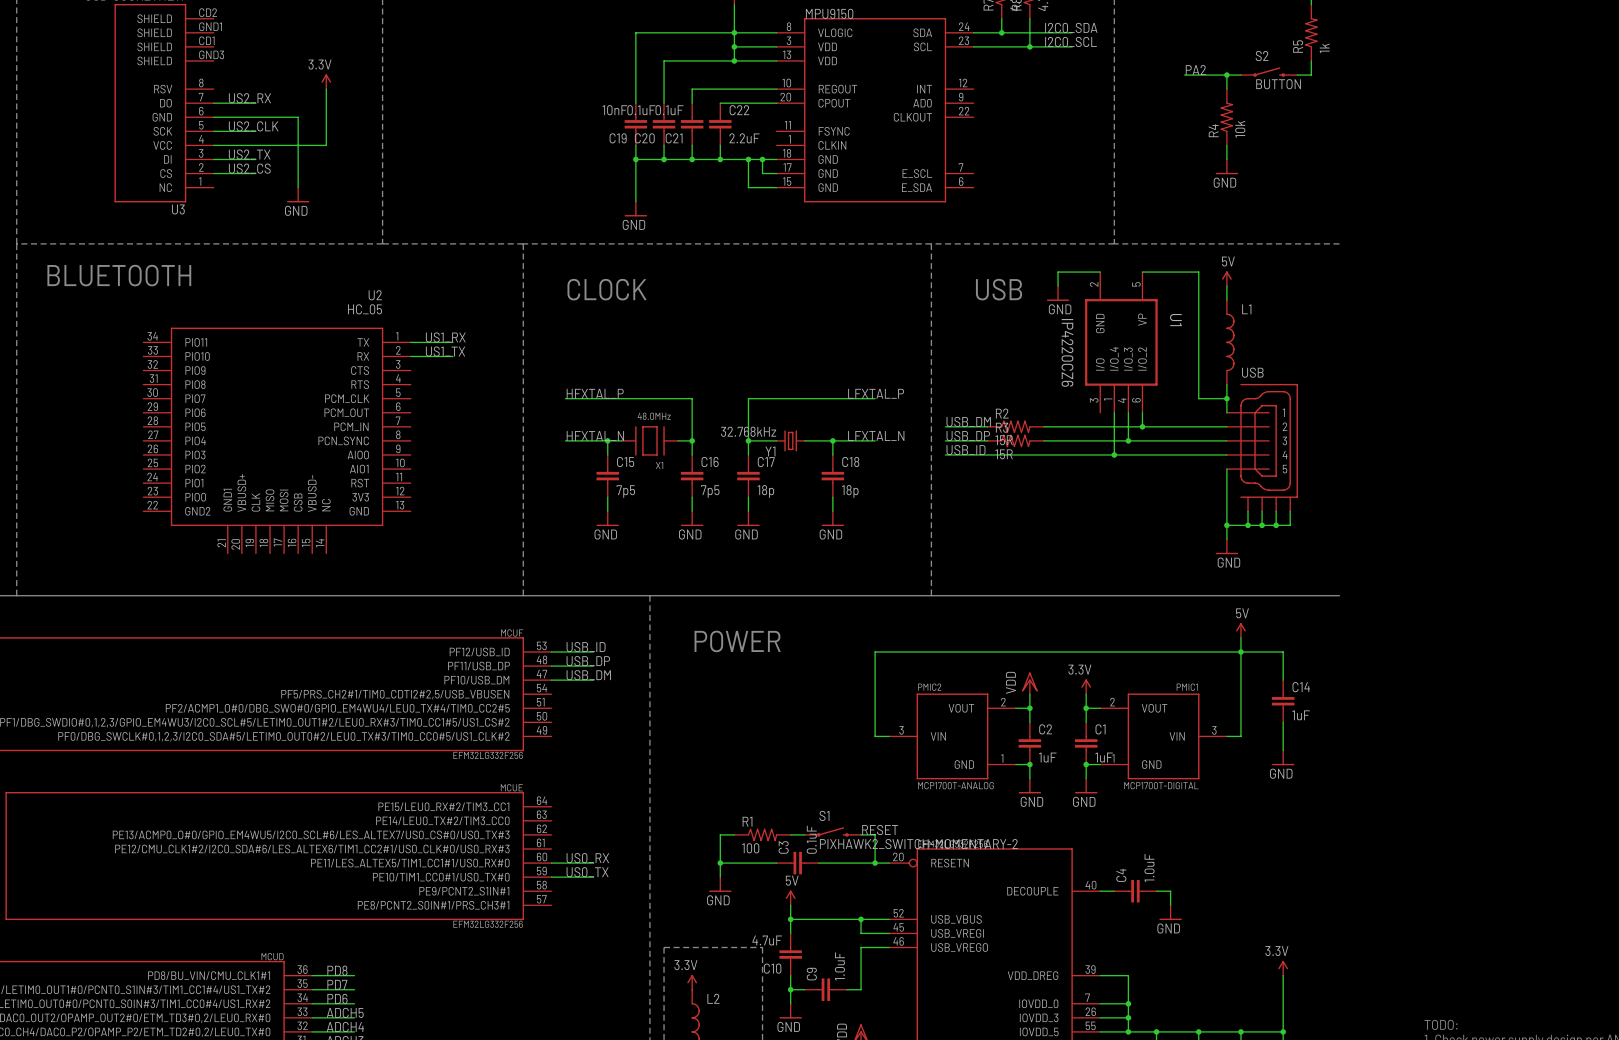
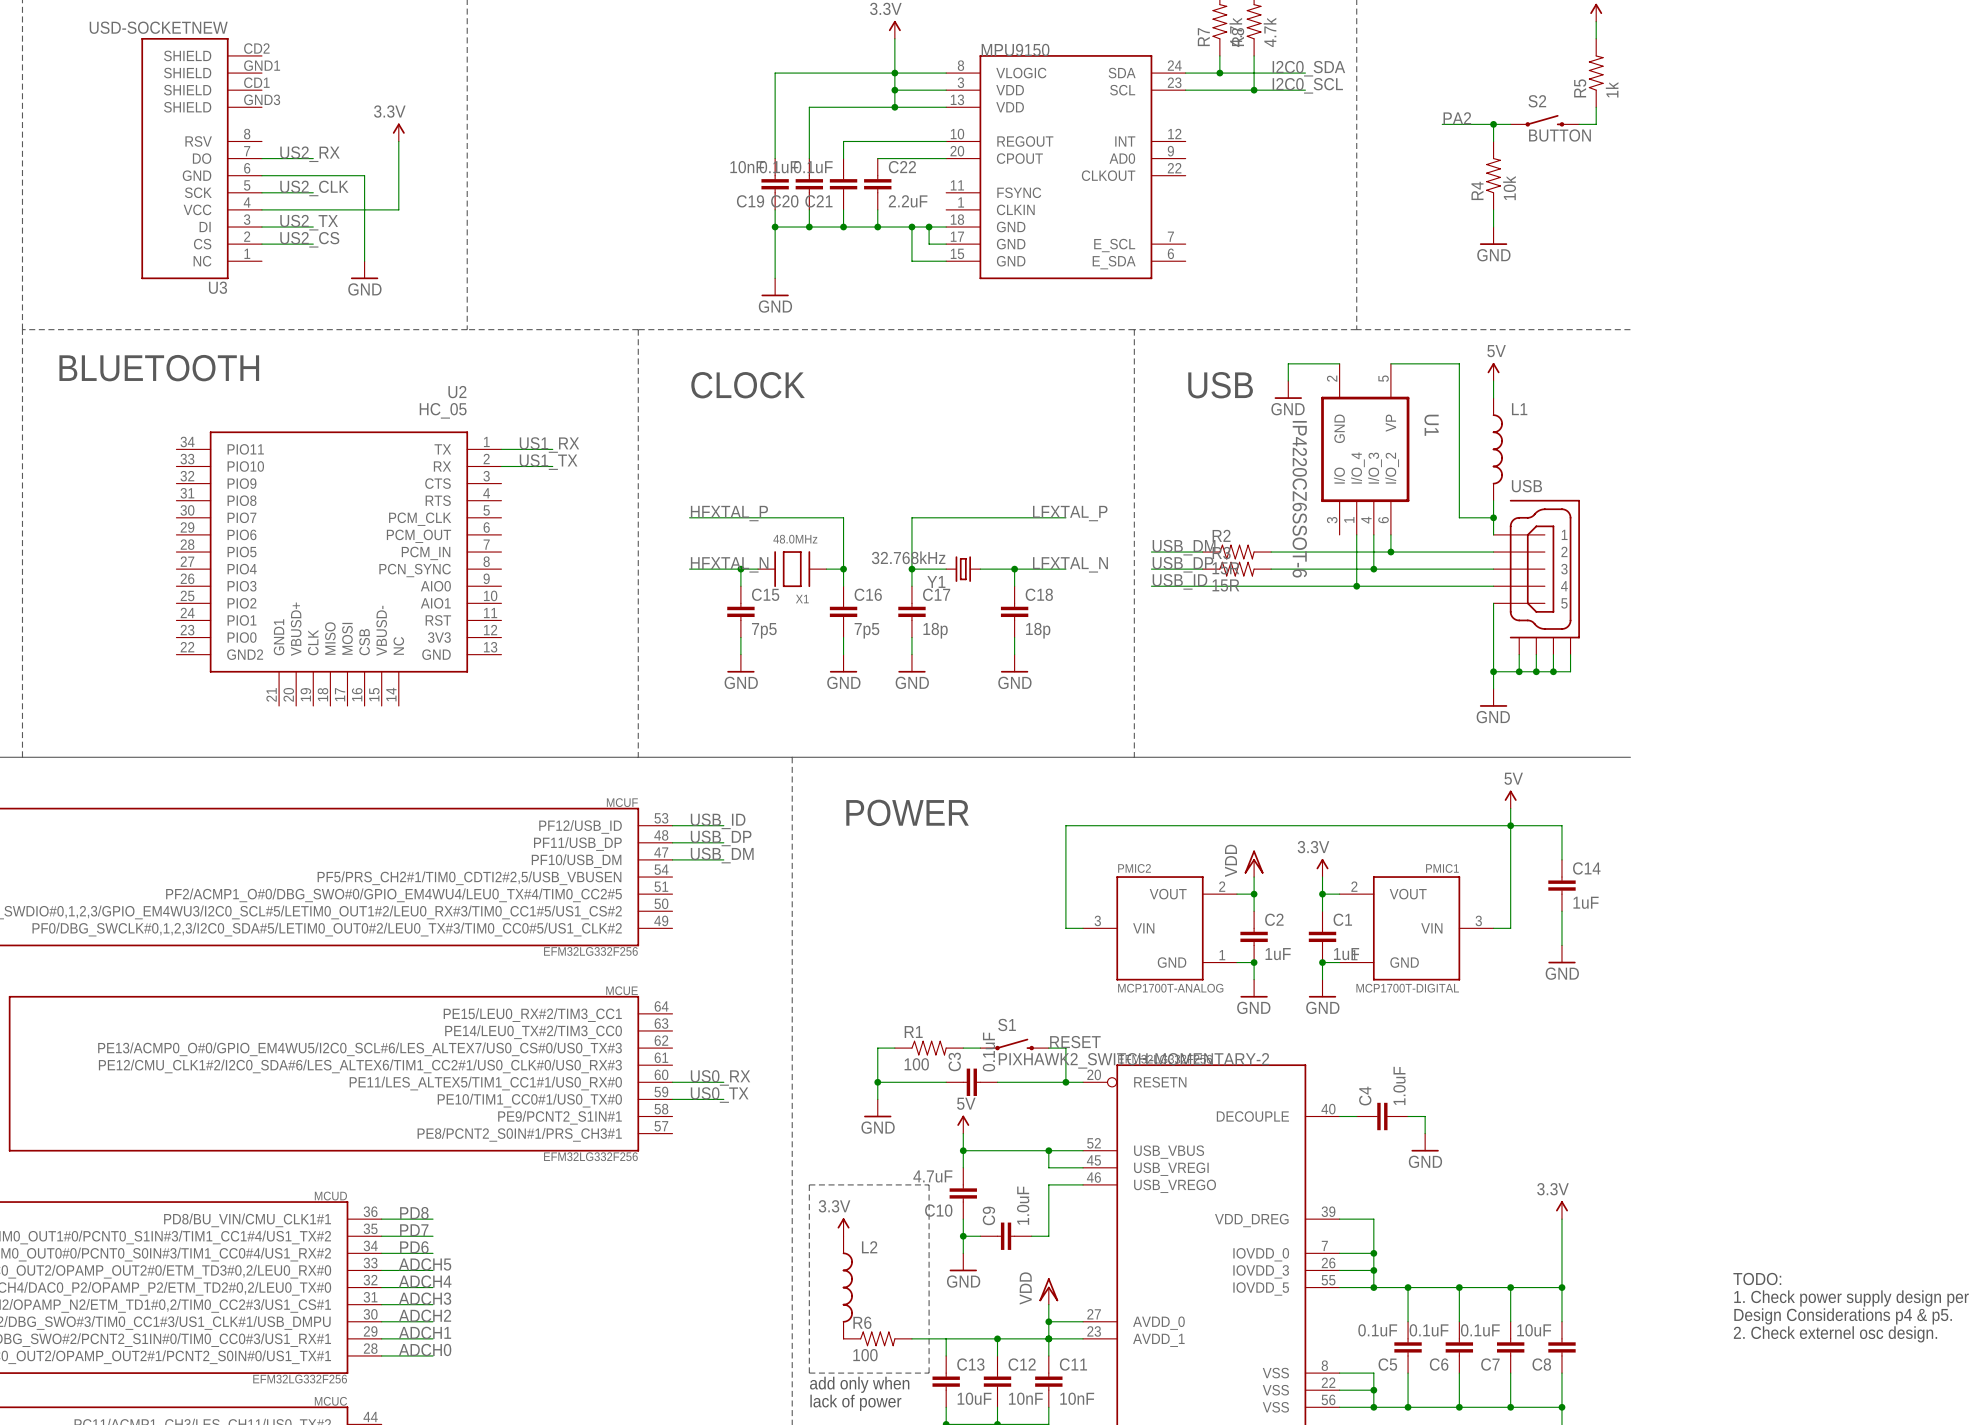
U1 value: IP4220CZ6 (1067, 352) -> IP4220CZ6SSOT-6 (1299, 499)

